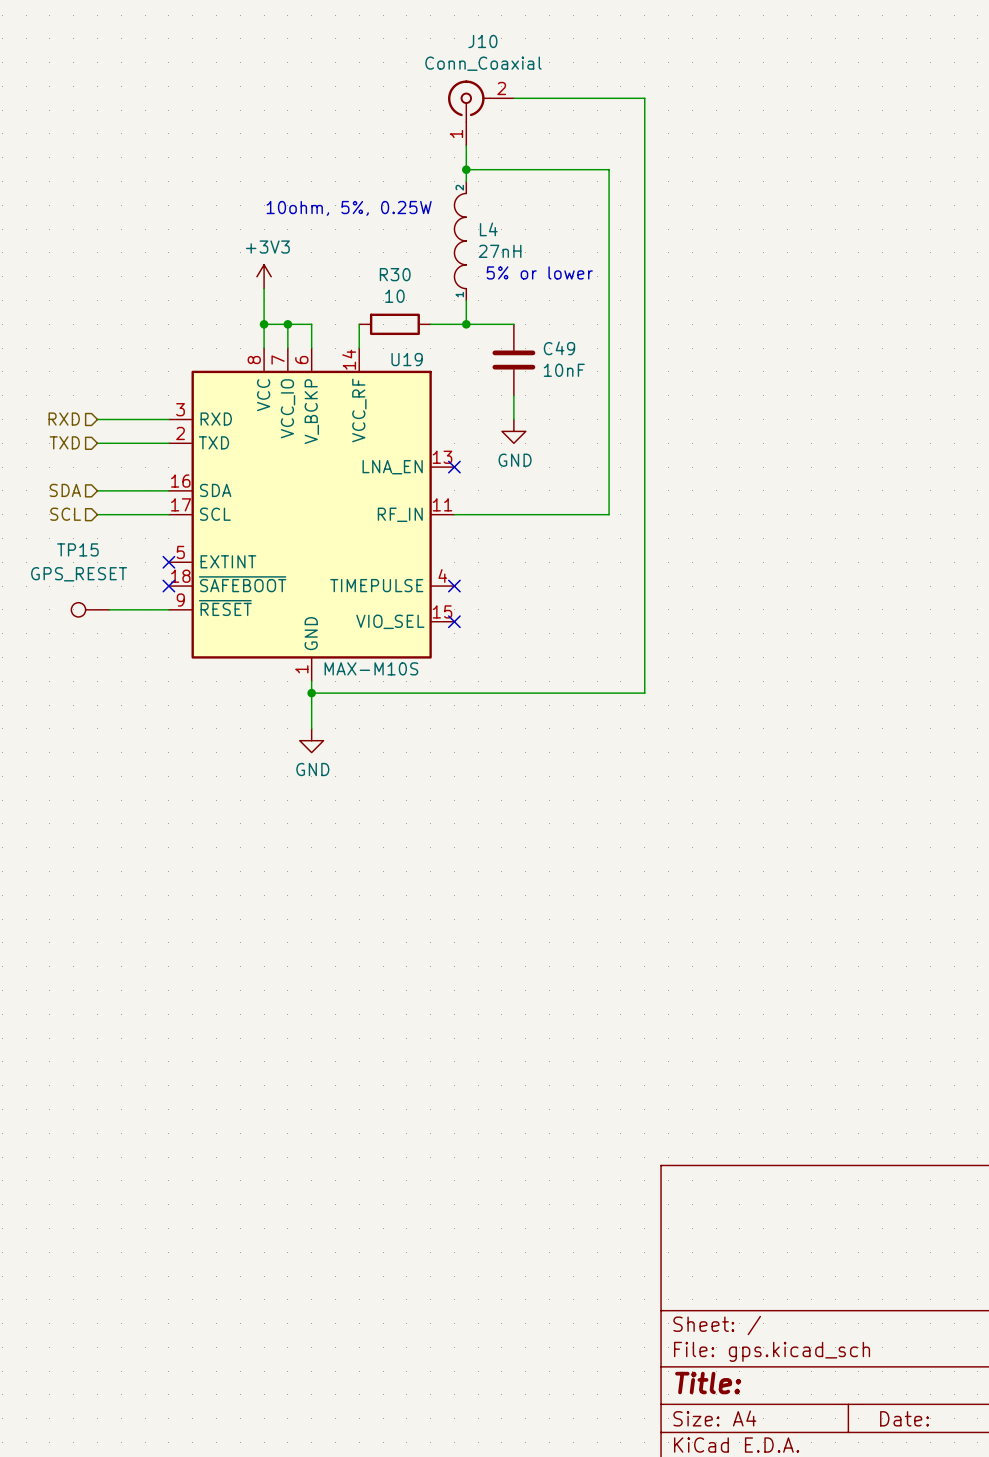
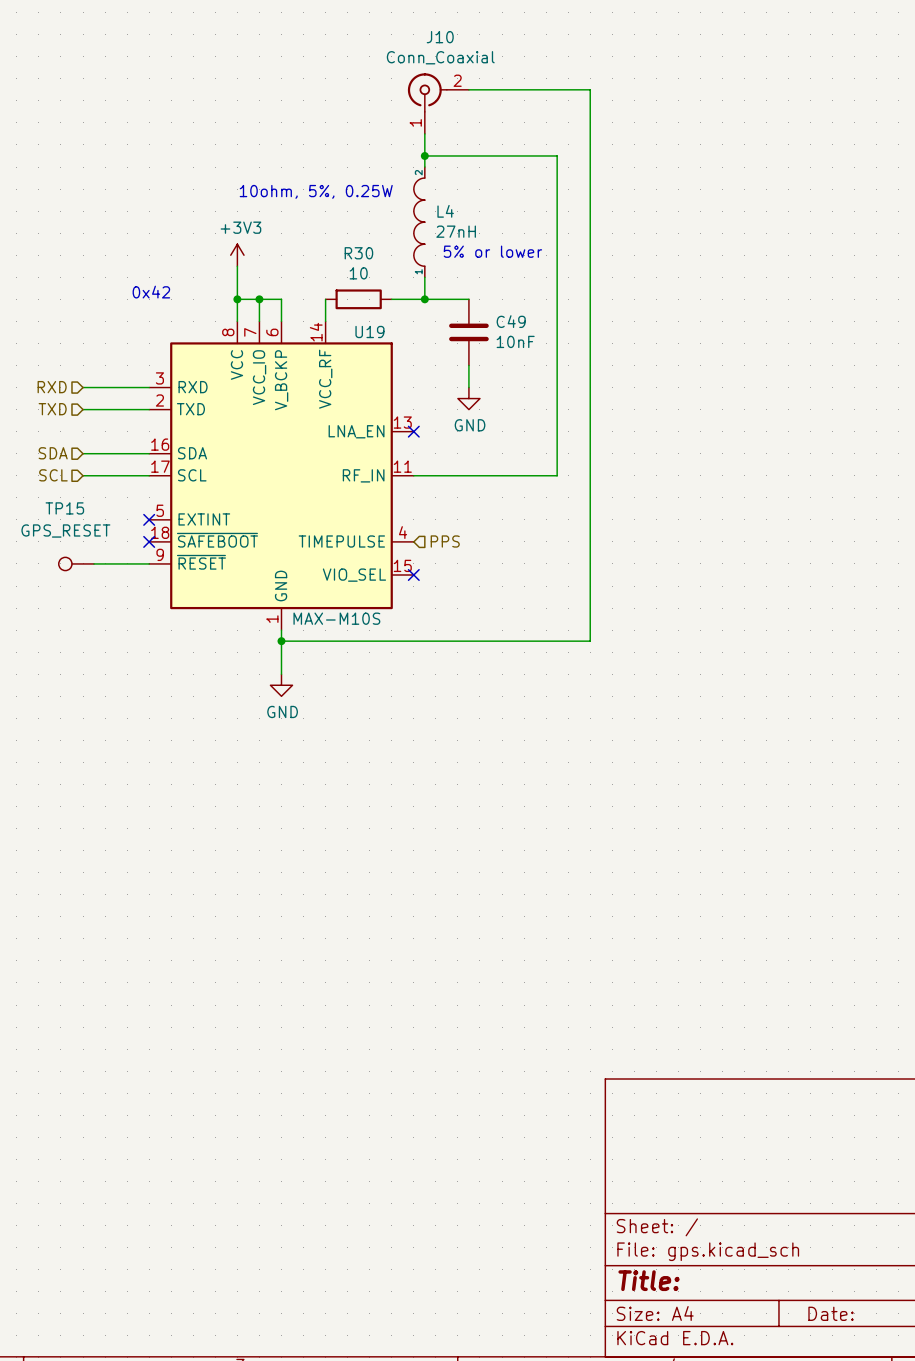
text: none -> 0x42 (151, 292)
hierarchical label: none -> PPS (445, 541)
no-connect mark: (454, 586) -> none

